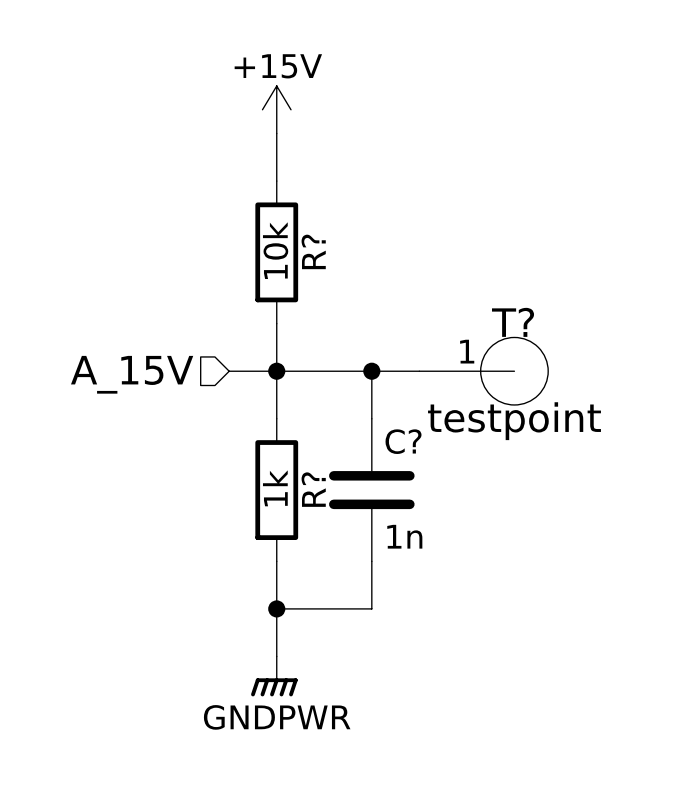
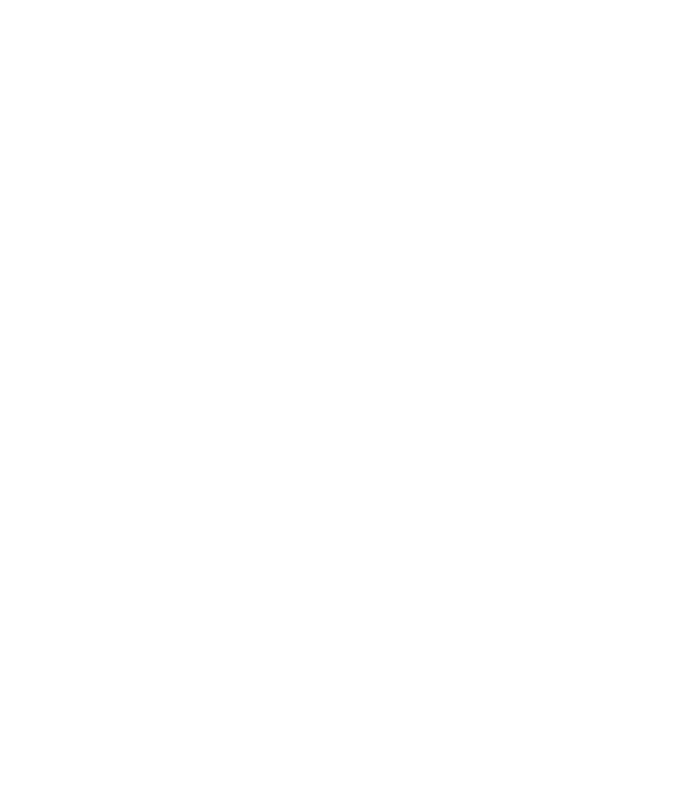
power symbol: +15V (276, 109) -> none
wire: (276, 133) (276, 181) -> none
R?: 10k (276, 252) -> none
wire: (276, 323) (276, 418) -> none
wire: (229, 371) (419, 371) -> none
junction: (276, 371) -> none
wire: (371, 371) (371, 418) -> none
junction: (371, 371) -> none
T?: testpoint (483, 371) -> none
hierarchical label: A_15V (132, 374) -> none
R?: 1k (276, 490) -> none
C?: 1n (371, 490) -> none
wire: (276, 561) (276, 656) -> none
wire: (371, 561) (371, 608) (276, 608) -> none
junction: (276, 608) -> none
power symbol: GNDPWR (274, 676) -> none

